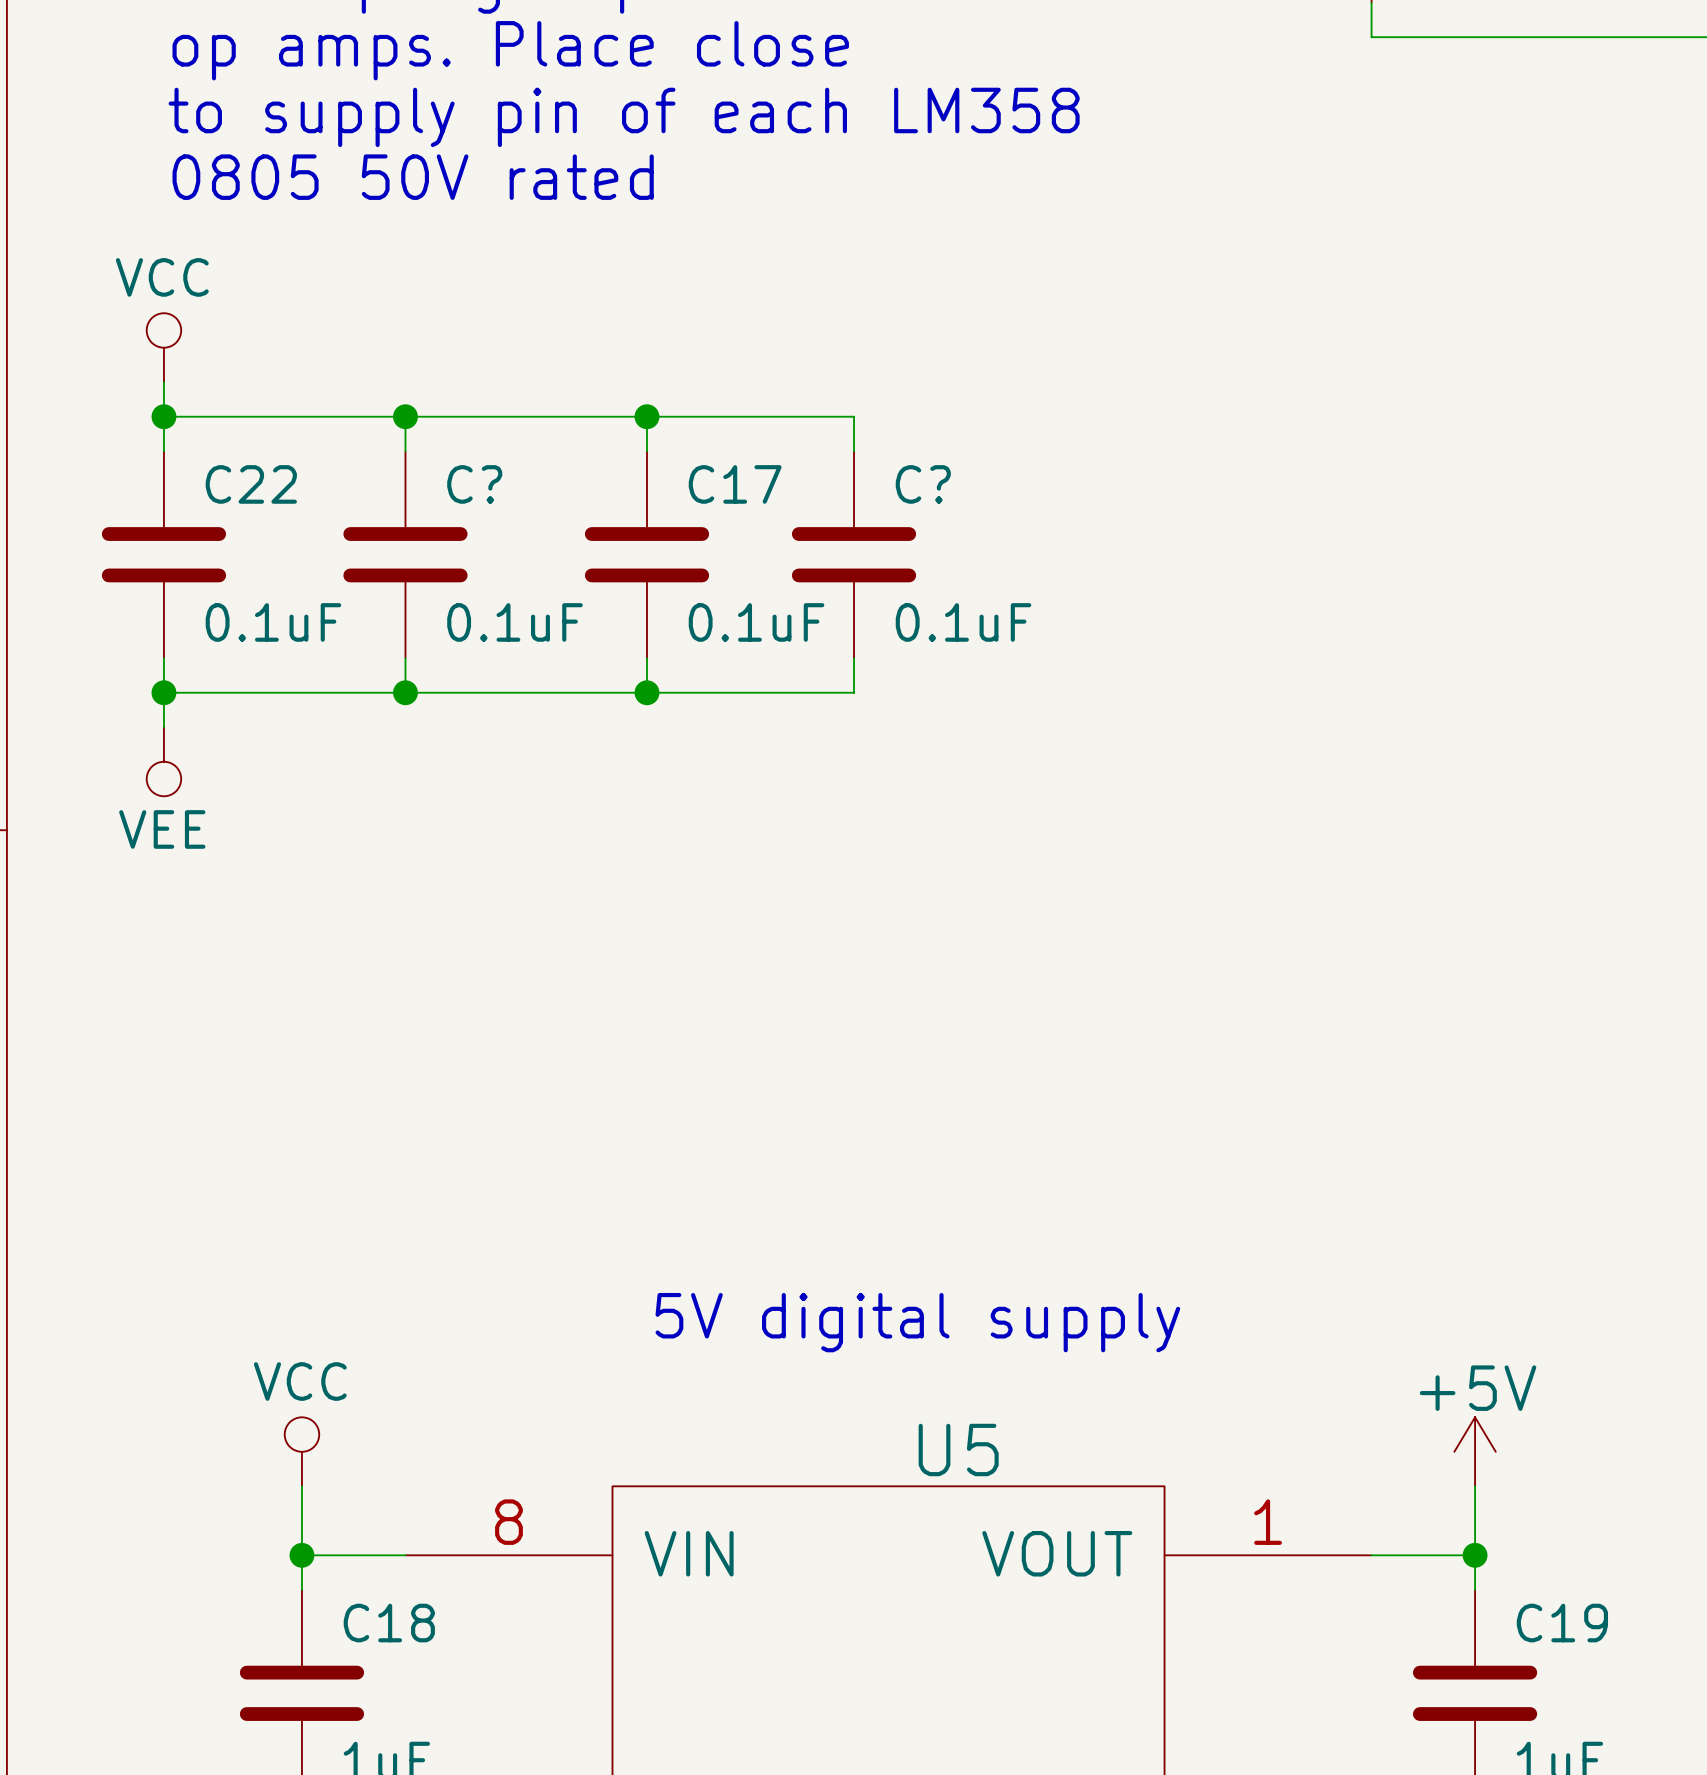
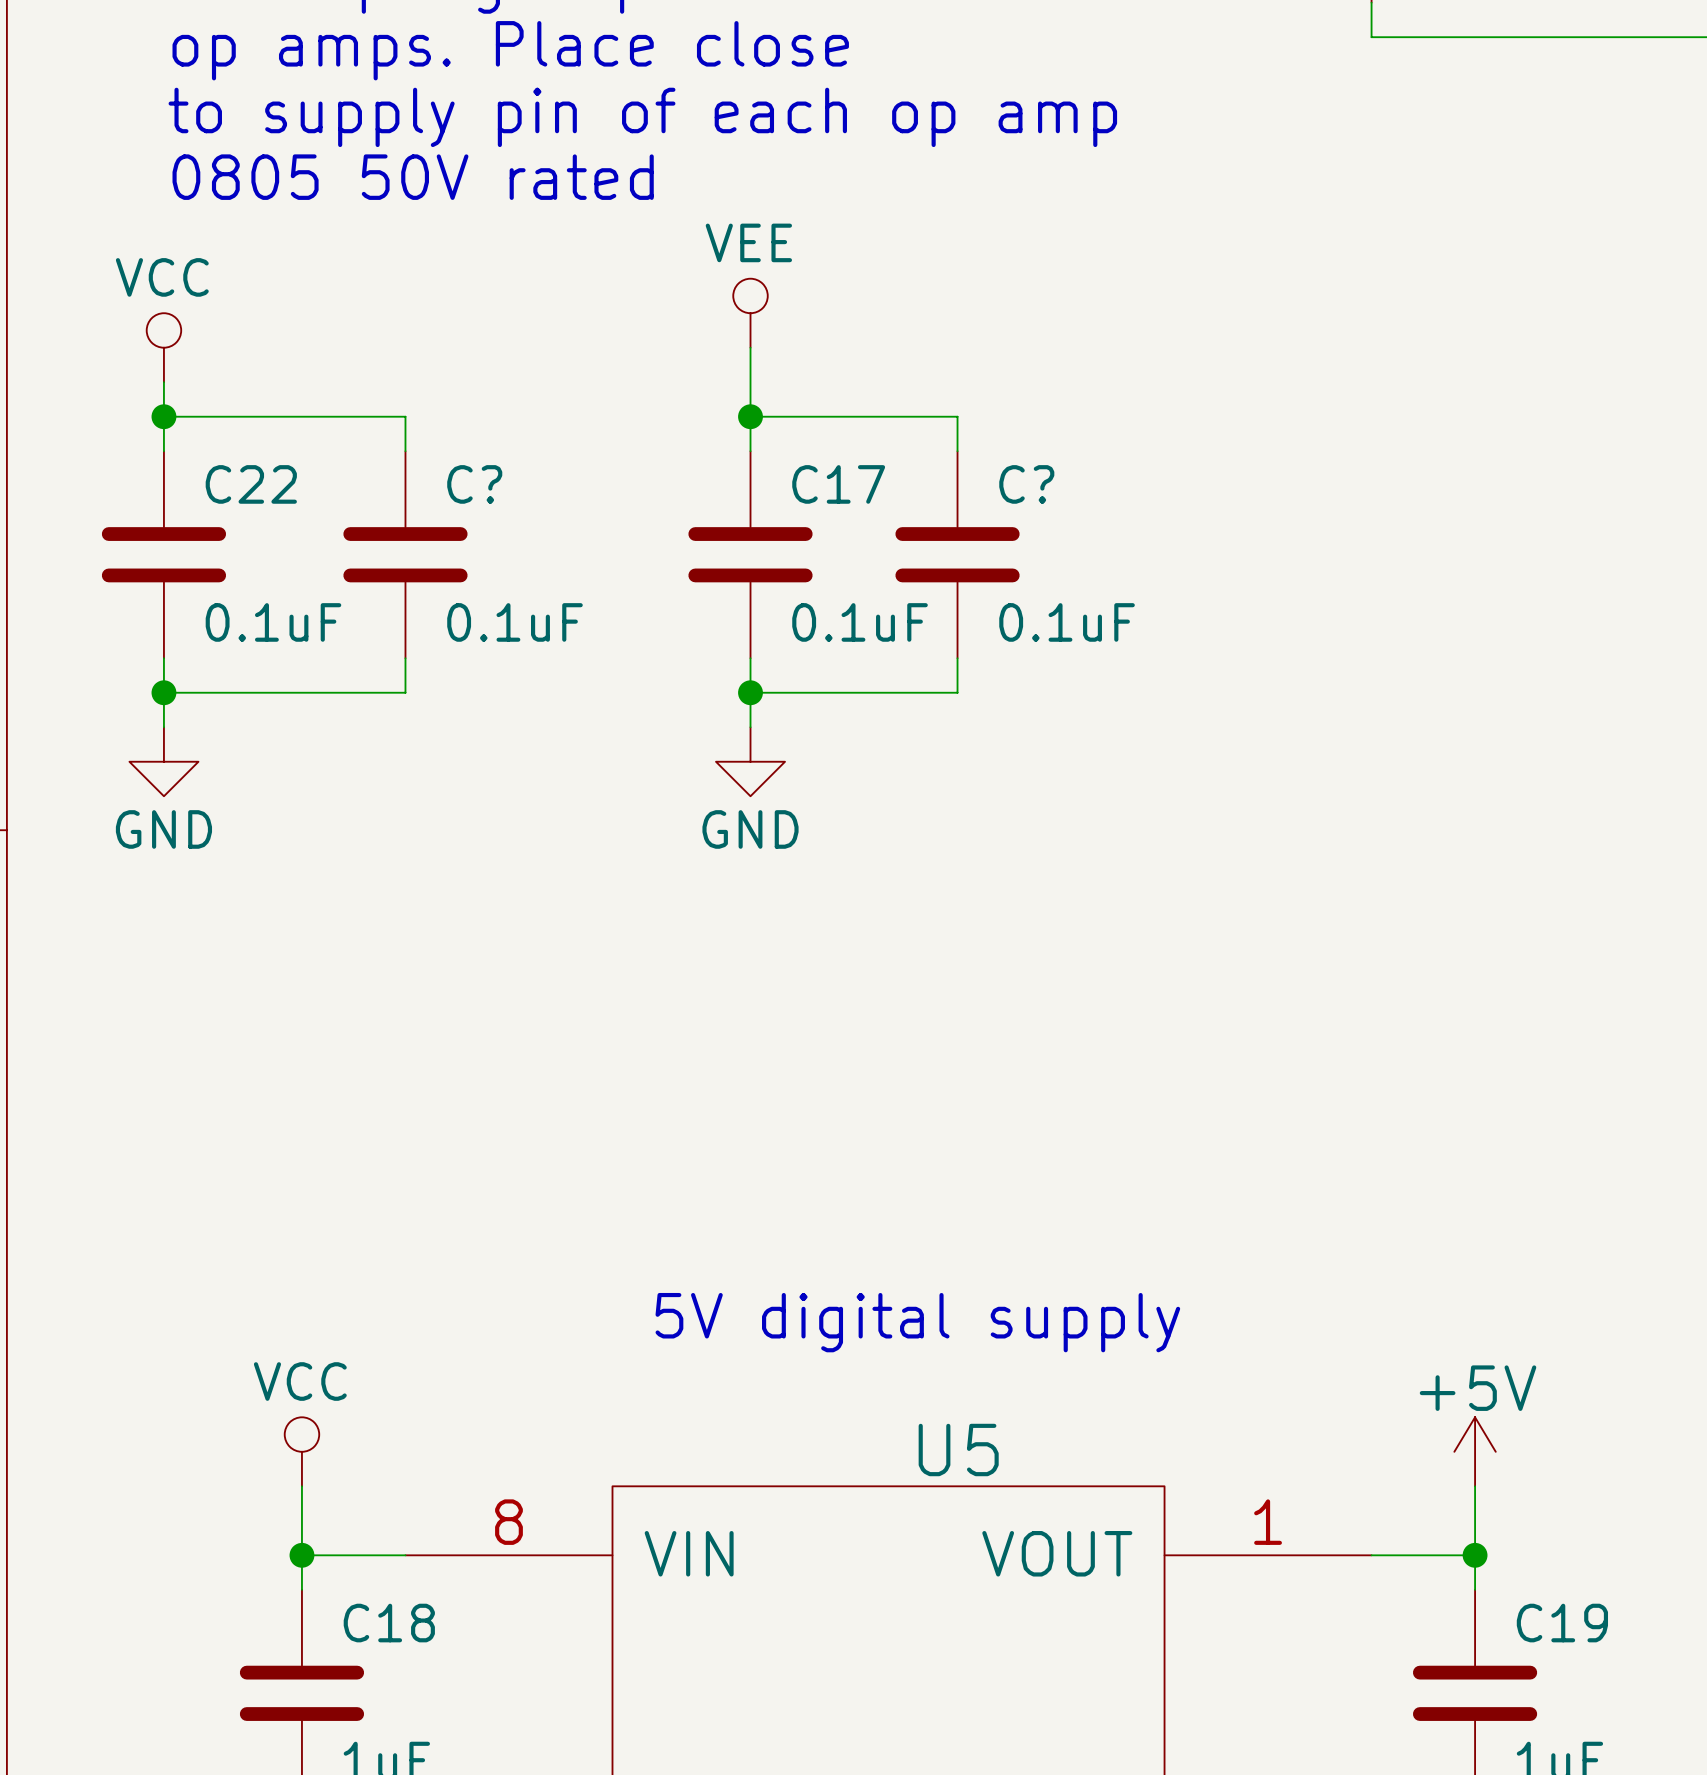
text: to supply pin of each LM358 (624, 117) -> to supply pin of each op amp (642, 117)
power symbol: none -> VEE (750, 313)
wire: none -> (750, 347) (750, 451)
wire: (405, 416) (750, 416) -> none
junction: (405, 416) -> none
wire: (647, 416) (647, 451) -> none
junction position: (647, 416) -> (750, 416)
wire: (854, 416) (854, 451) -> (854, 416) (957, 416) (957, 451)
C17 position: (647, 554) -> (750, 554)
C? position: (854, 554) -> (957, 554)
wire: (647, 658) (647, 692) -> none
wire: none -> (750, 658) (750, 727)
wire: (854, 658) (854, 692) -> (957, 658) (957, 692) (854, 692)
wire: (405, 692) (750, 692) -> none
junction: (405, 692) -> none
junction position: (647, 692) -> (750, 692)
power symbol: VEE (163, 761) -> GND (163, 761)
power symbol: none -> GND (750, 761)

